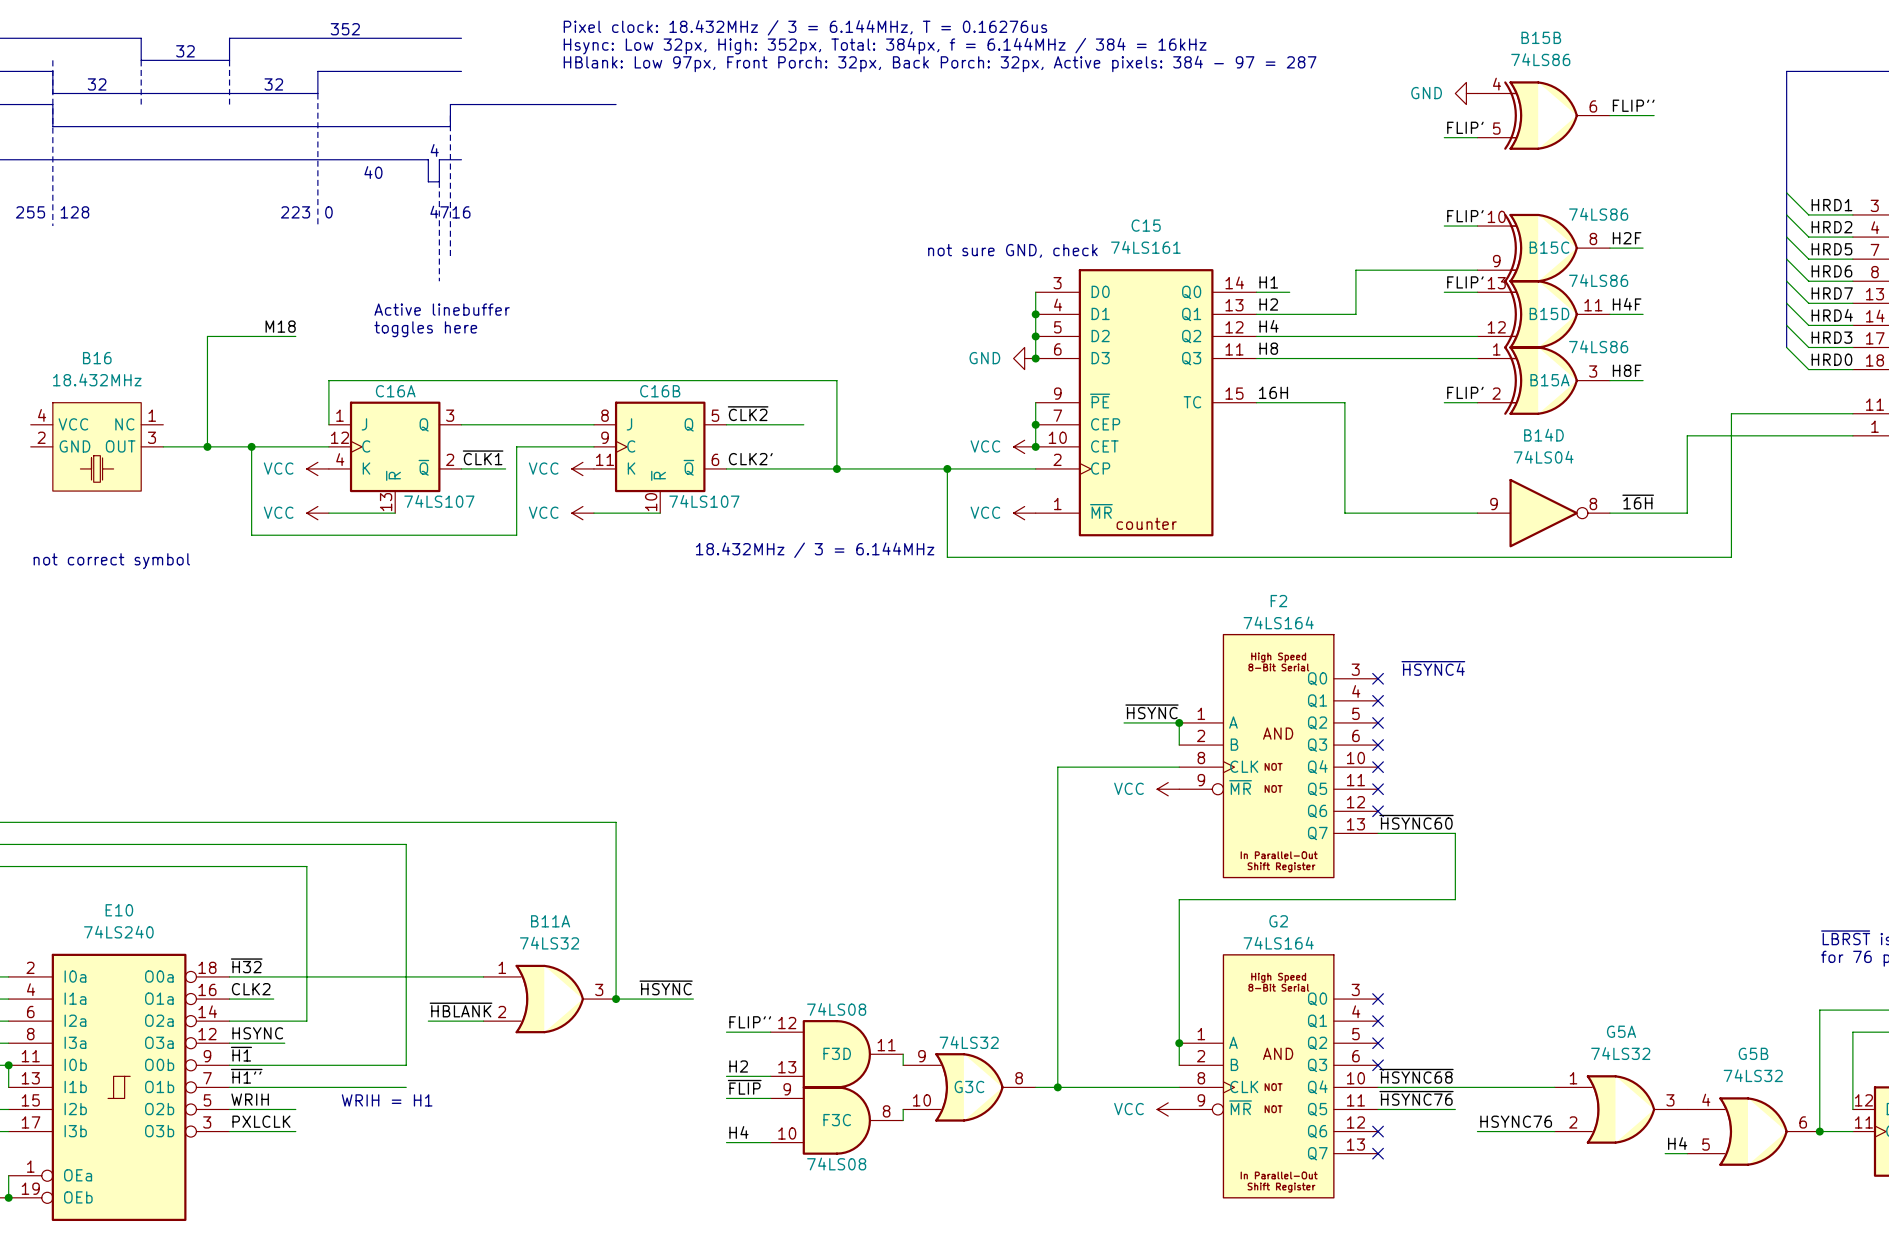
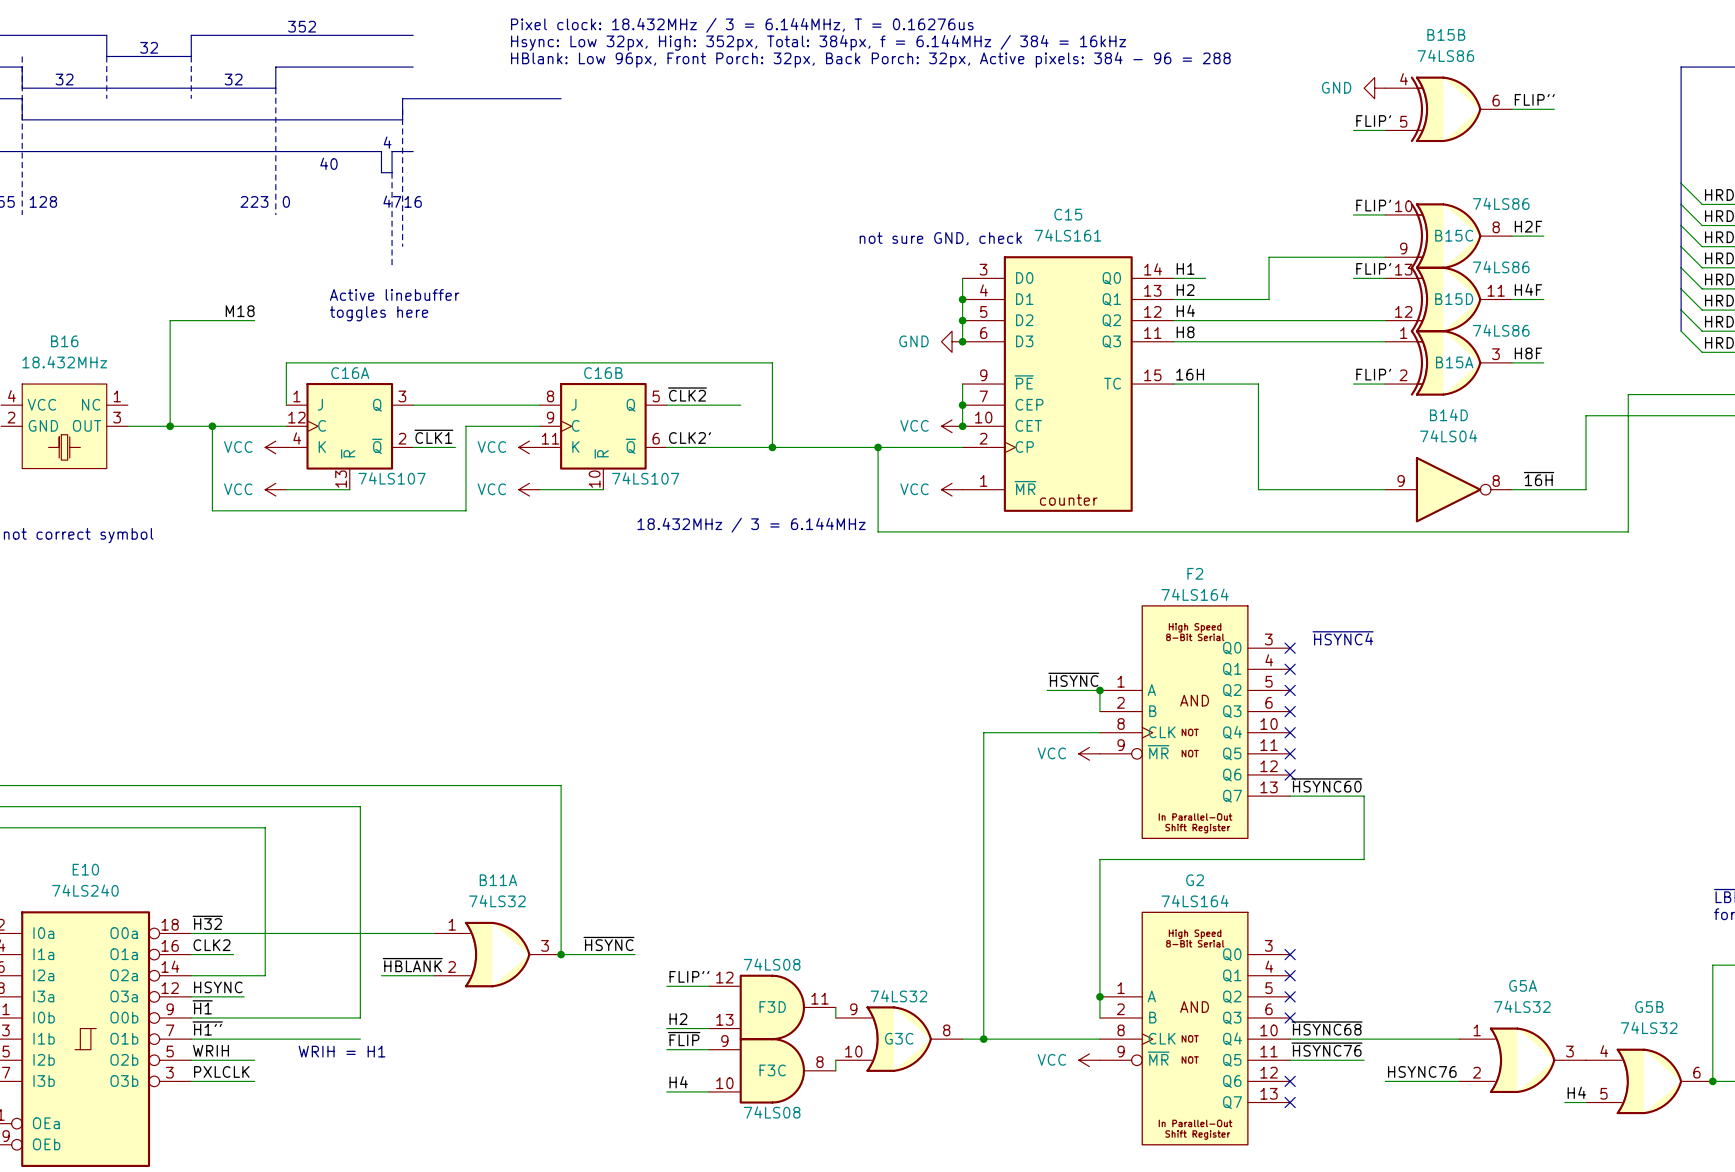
text: HBlank: Low 97px, Front Porch: 32px, Back Porch: 32px, Active pixels: 384 - 97 = 287 (940, 63) -> HBlank: Low 96px, Front Porch: 32px, Back Porch: 32px, Active pixels: 384 - 96 = 288 (870, 59)

